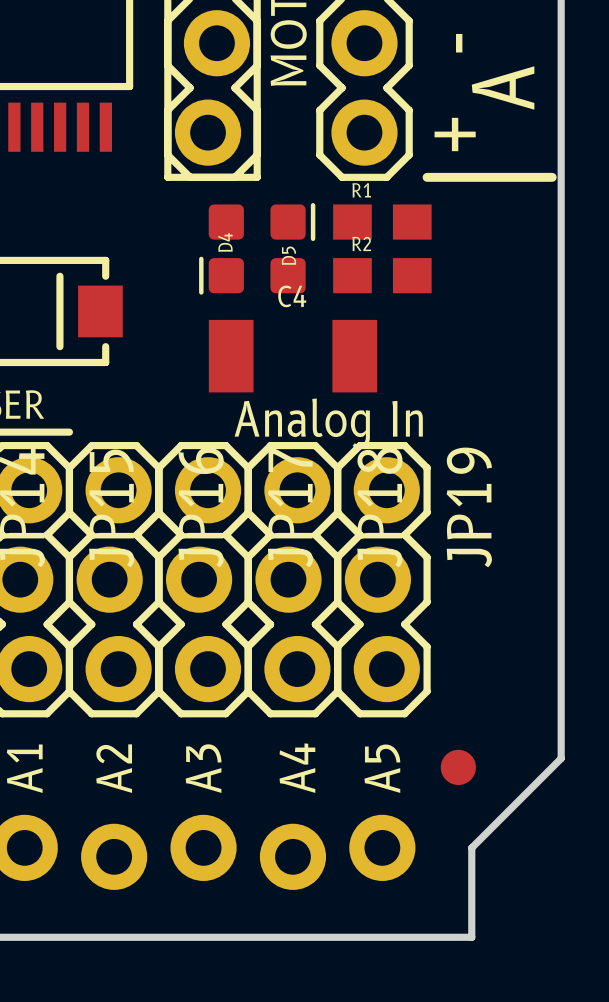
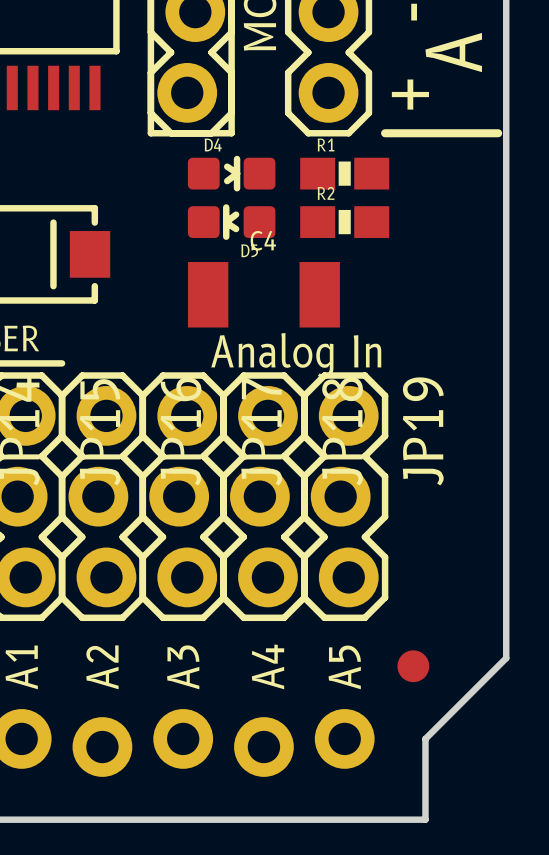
D4 footprint: [208, 203, 316, 242] -> [187, 155, 276, 192]
R1 footprint: [333, 204, 432, 240] -> [300, 157, 390, 190]
D5 footprint: [199, 256, 306, 295] -> [187, 204, 276, 240]
R2 footprint: [333, 258, 432, 294] -> [300, 206, 390, 238]

